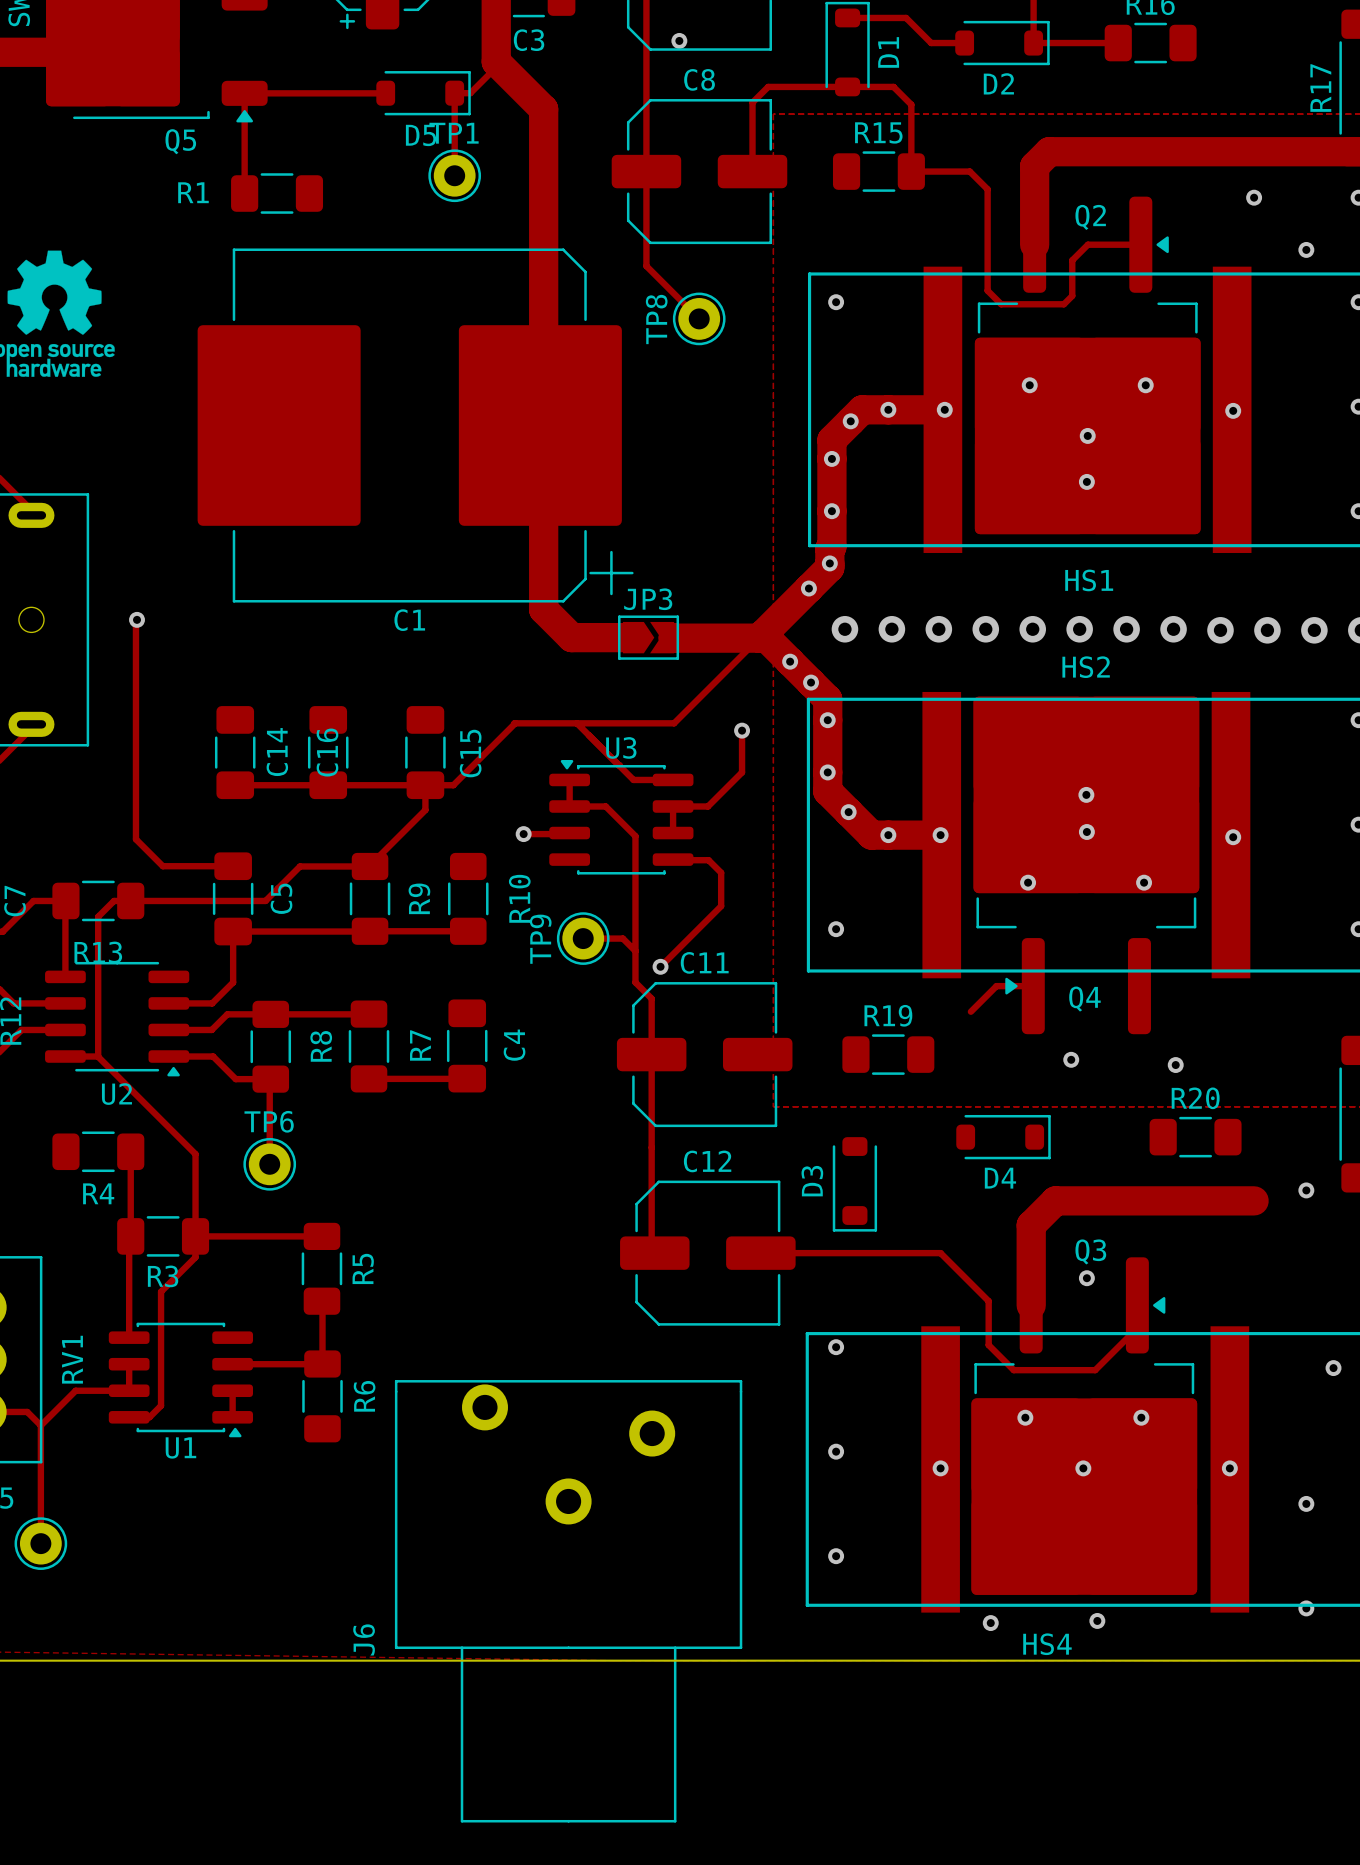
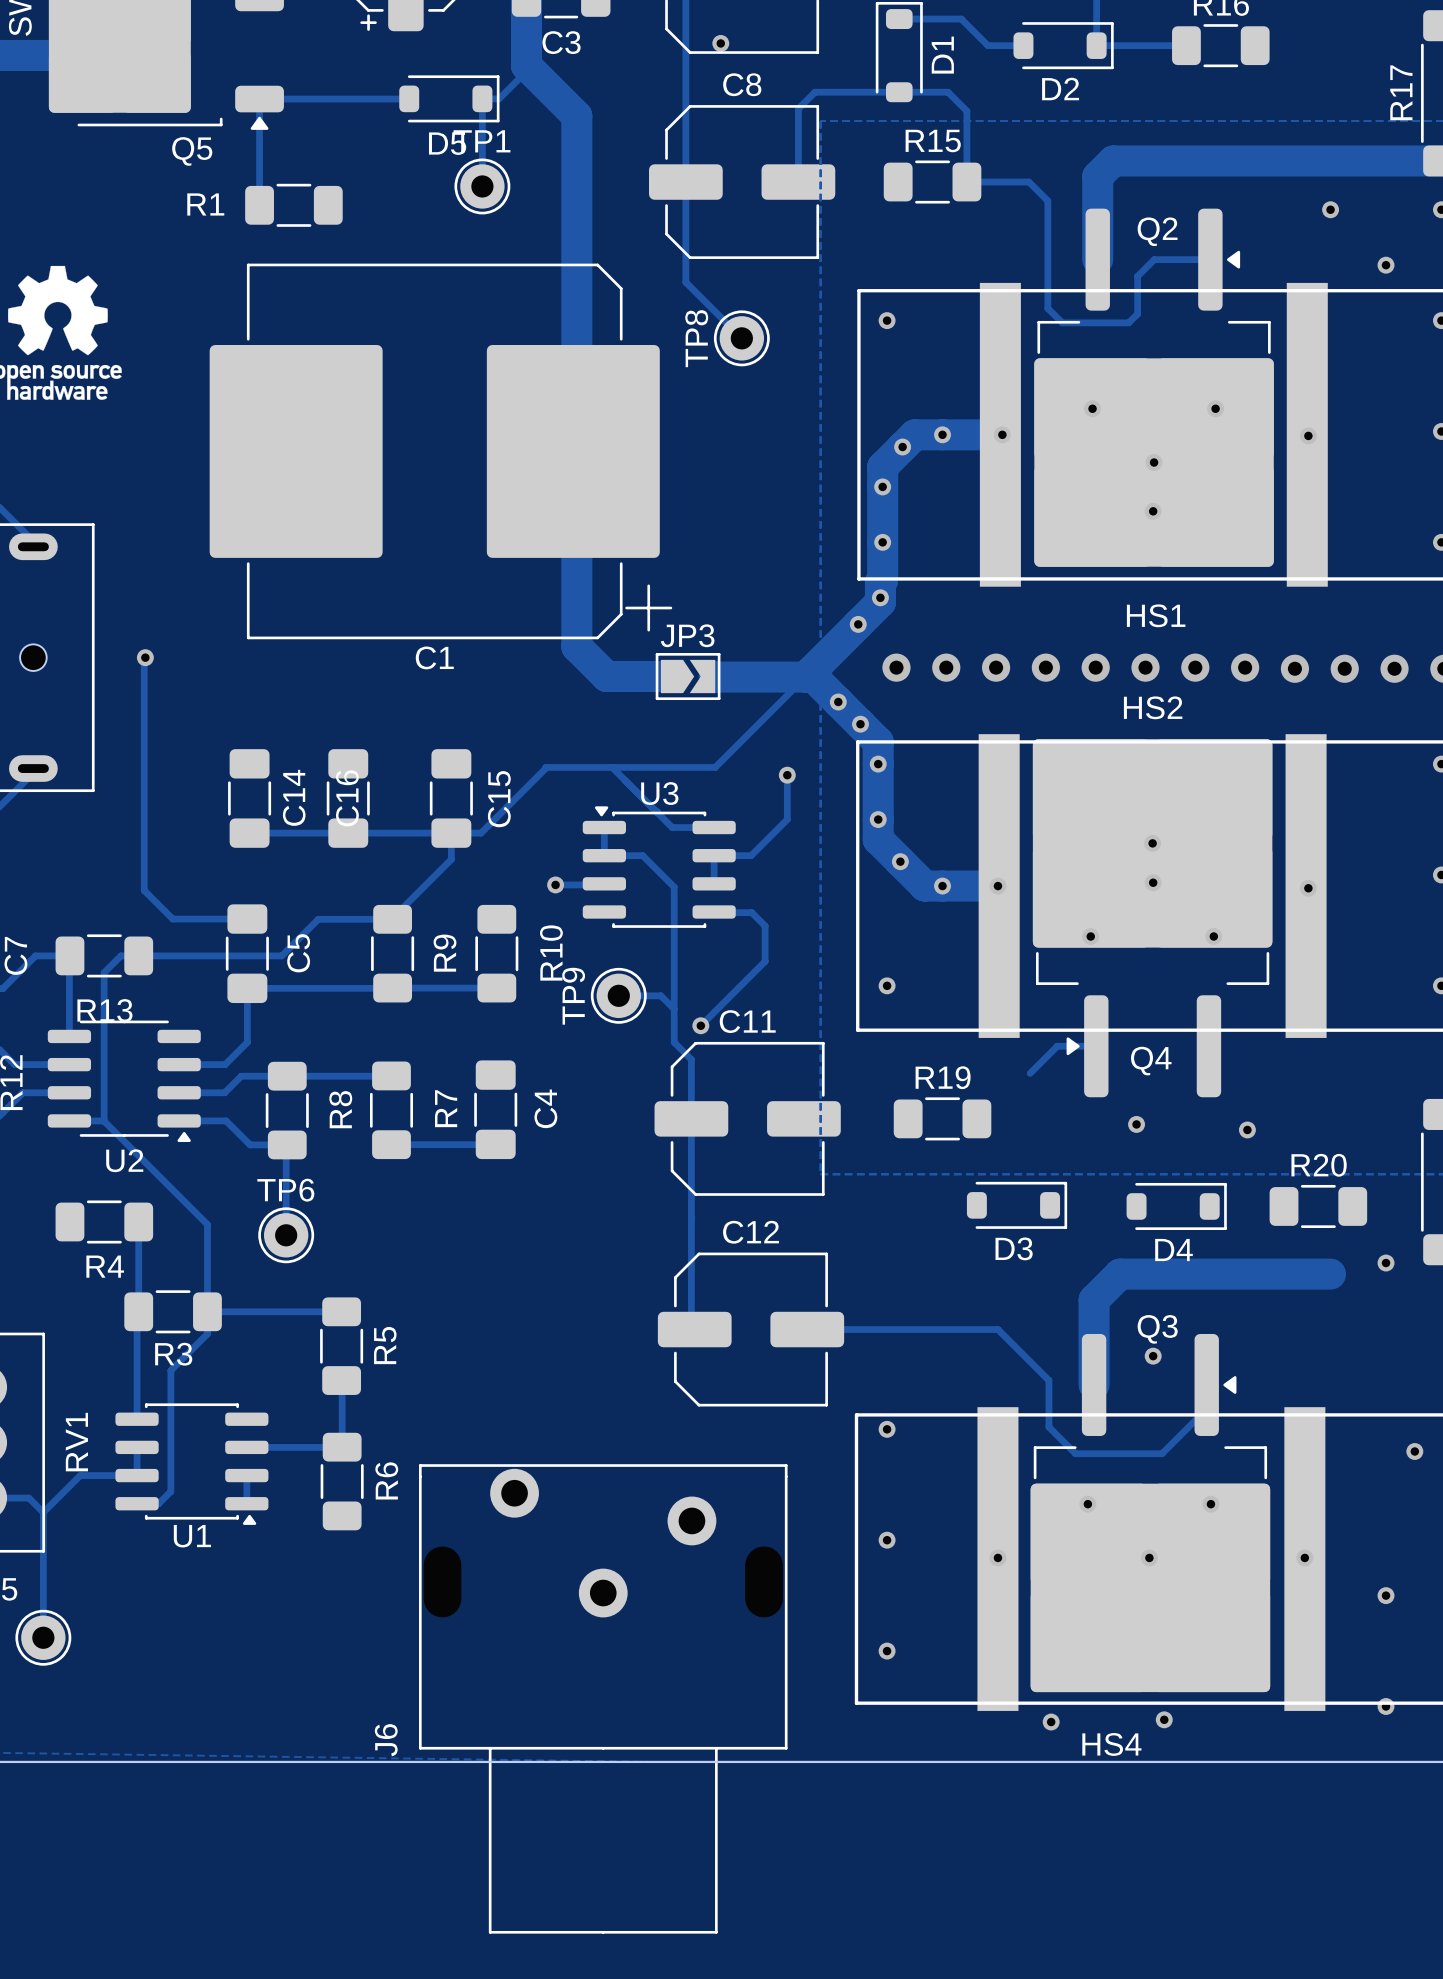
D4 position: (1003, 1137) -> (1176, 1206)
R20 position: (1195, 1137) -> (1318, 1206)
D3 rotation: 0° (854, 1184) -> 90° counterclockwise (1017, 1205)
D3 position: (854, 1184) -> (1017, 1205)

